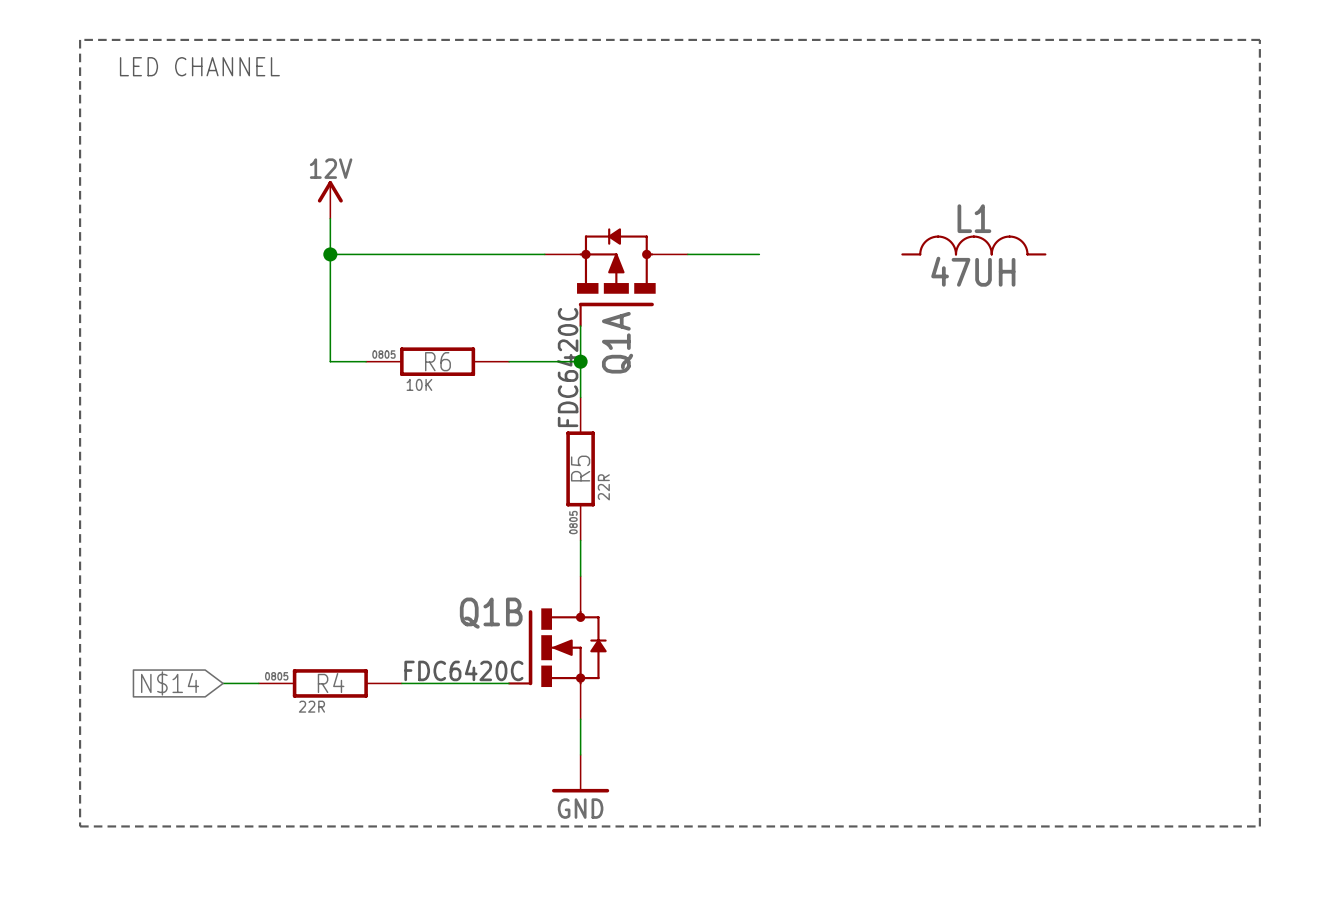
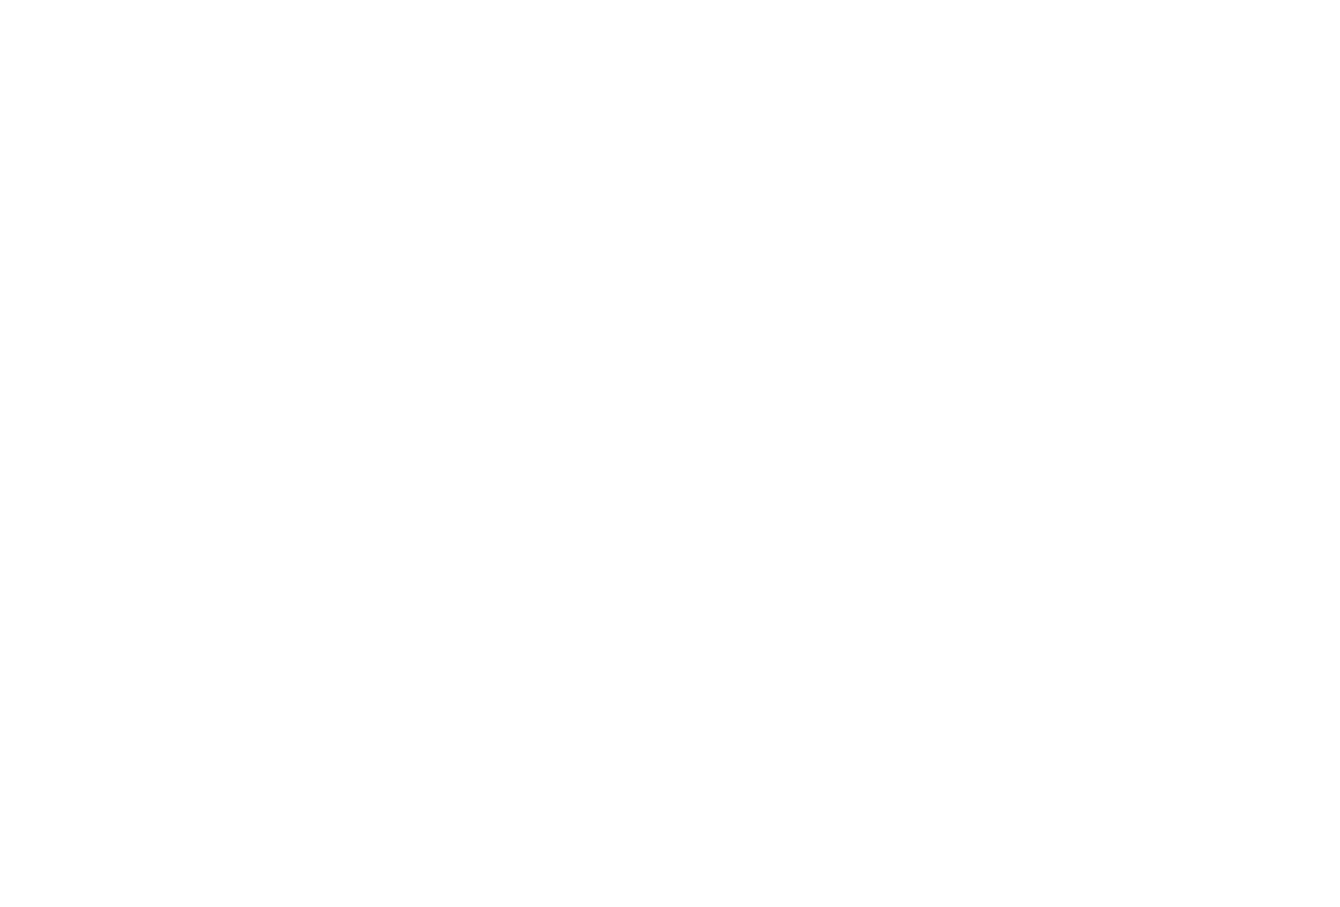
line: (80, 39) (80, 826) (1259, 826) (1259, 39) (80, 39) -> none
text: LED CHANNEL (199, 66) -> none
power symbol: 12V (330, 199) -> none
wire: (330, 218) (330, 361) (366, 361) -> none
L1: 47UH (973, 245) -> none
wire: (330, 254) (544, 254) -> none
junction: (330, 254) -> none
wire: (687, 254) (759, 254) -> none
Q1A: (616, 277) -> none
wire: (580, 325) (580, 397) -> none
R6: 10K (437, 361) -> none
wire: (509, 361) (580, 361) -> none
junction: (580, 361) -> none
R5: 22R (580, 468) -> none
wire: (580, 540) (580, 576) -> none
Q1B: (557, 647) -> none
global label: N$14 (170, 683) -> none
wire: (223, 683) (258, 683) -> none
R4: 22R (330, 683) -> none
wire: (401, 683) (509, 683) -> none
wire: (580, 719) (580, 754) -> none
power symbol: GND (580, 773) -> none

